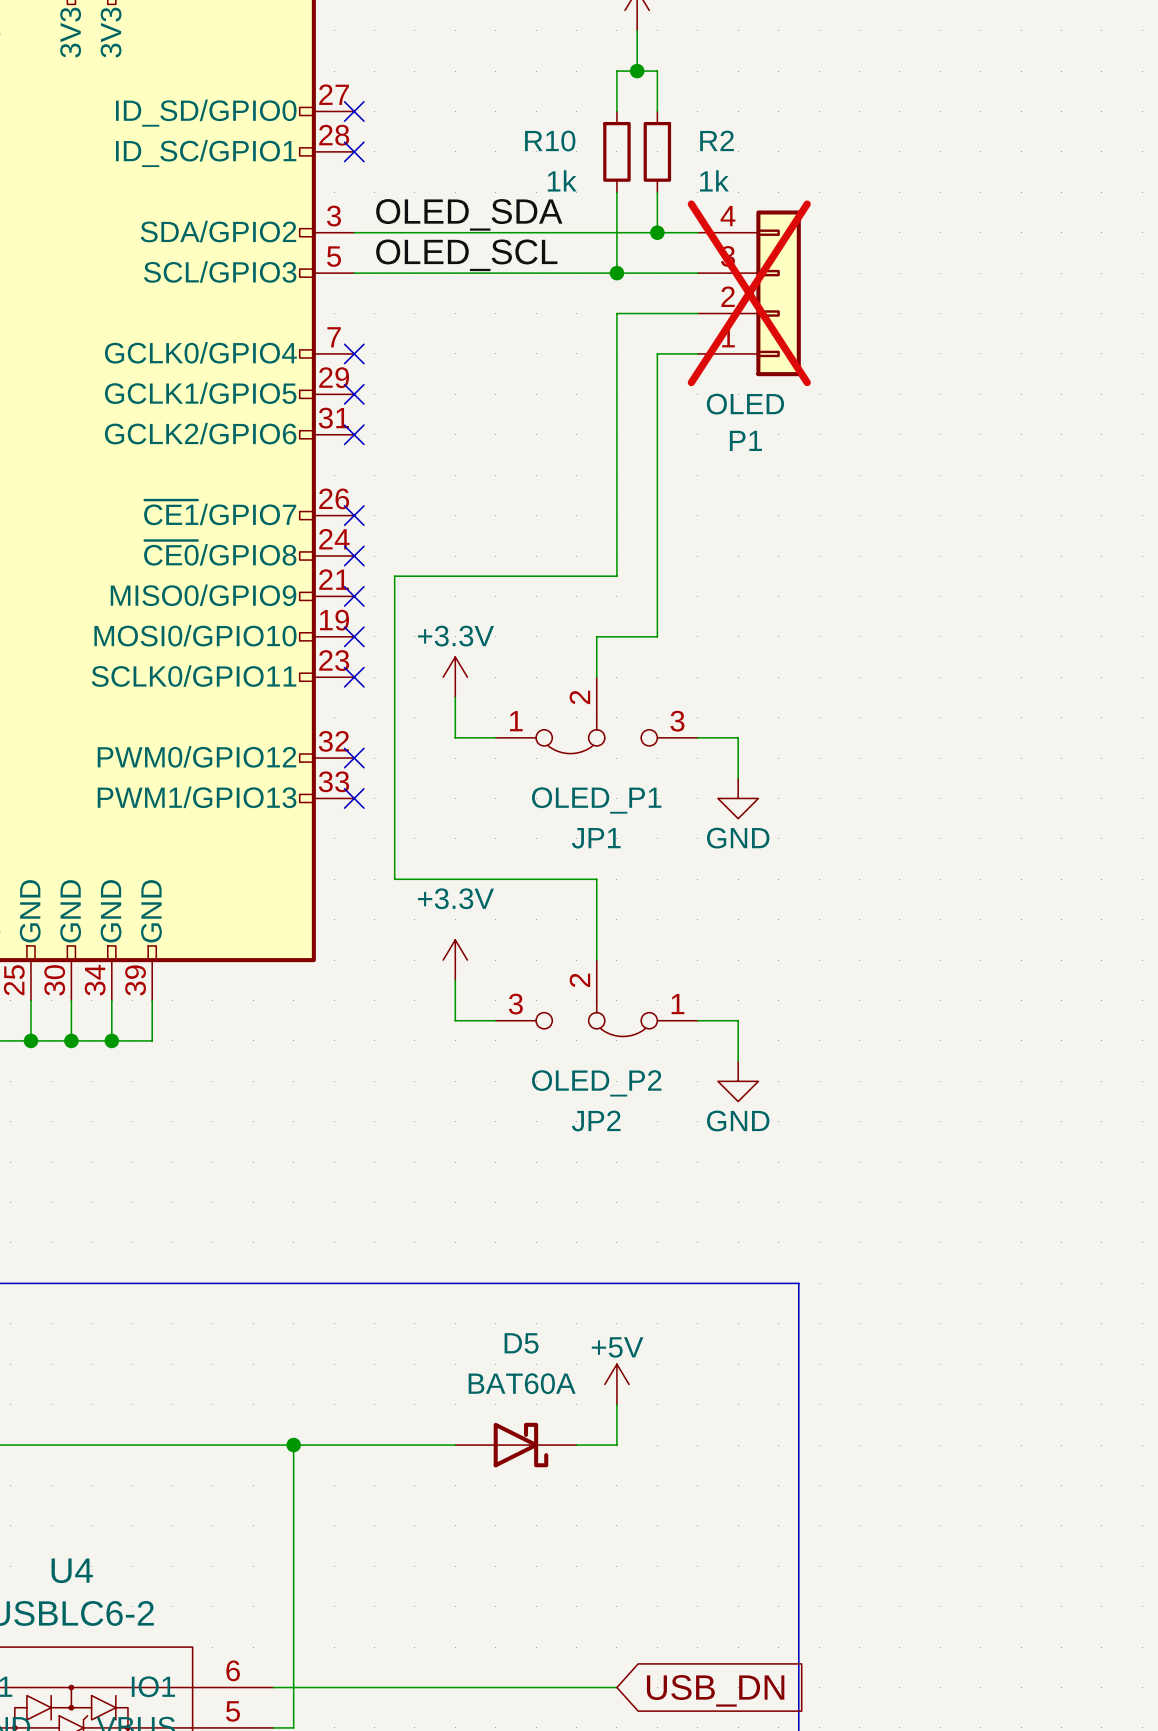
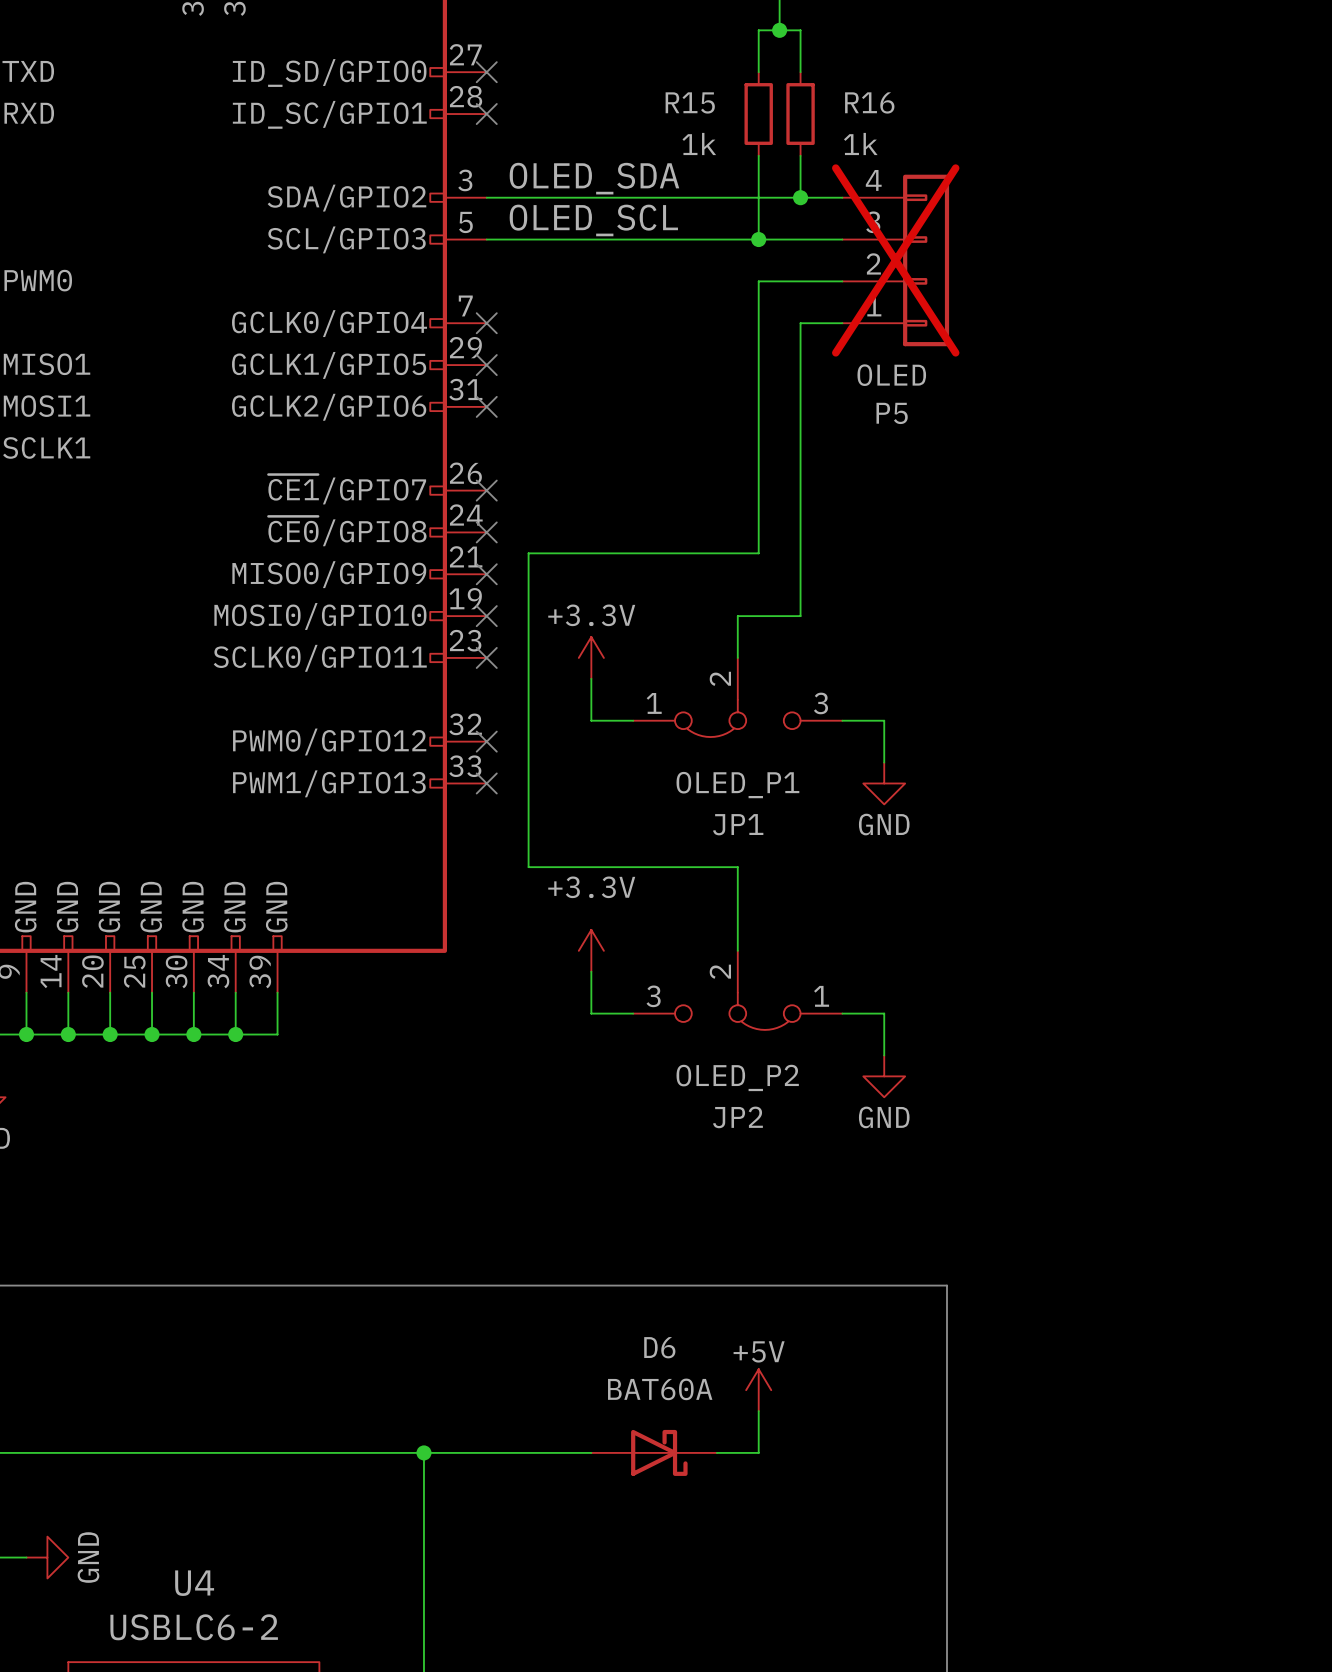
R2 name: R2 (717, 140) -> R16 (869, 102)
R10 name: R10 (550, 141) -> R15 (690, 102)
P1 name: P1 (745, 440) -> P5 (892, 413)
D5 name: D5 (521, 1343) -> D6 (659, 1347)

